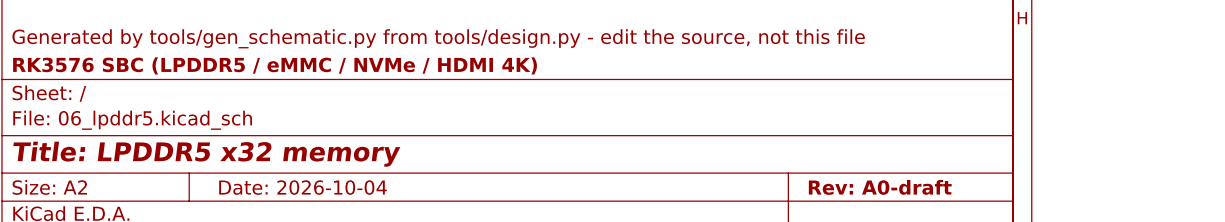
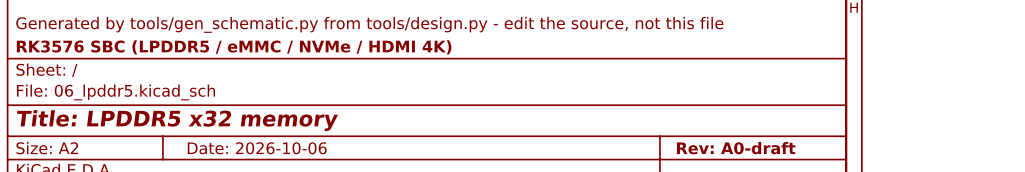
title block: Date: 2026-10-04 (303, 187) -> Date: 2026-10-06 (257, 148)

